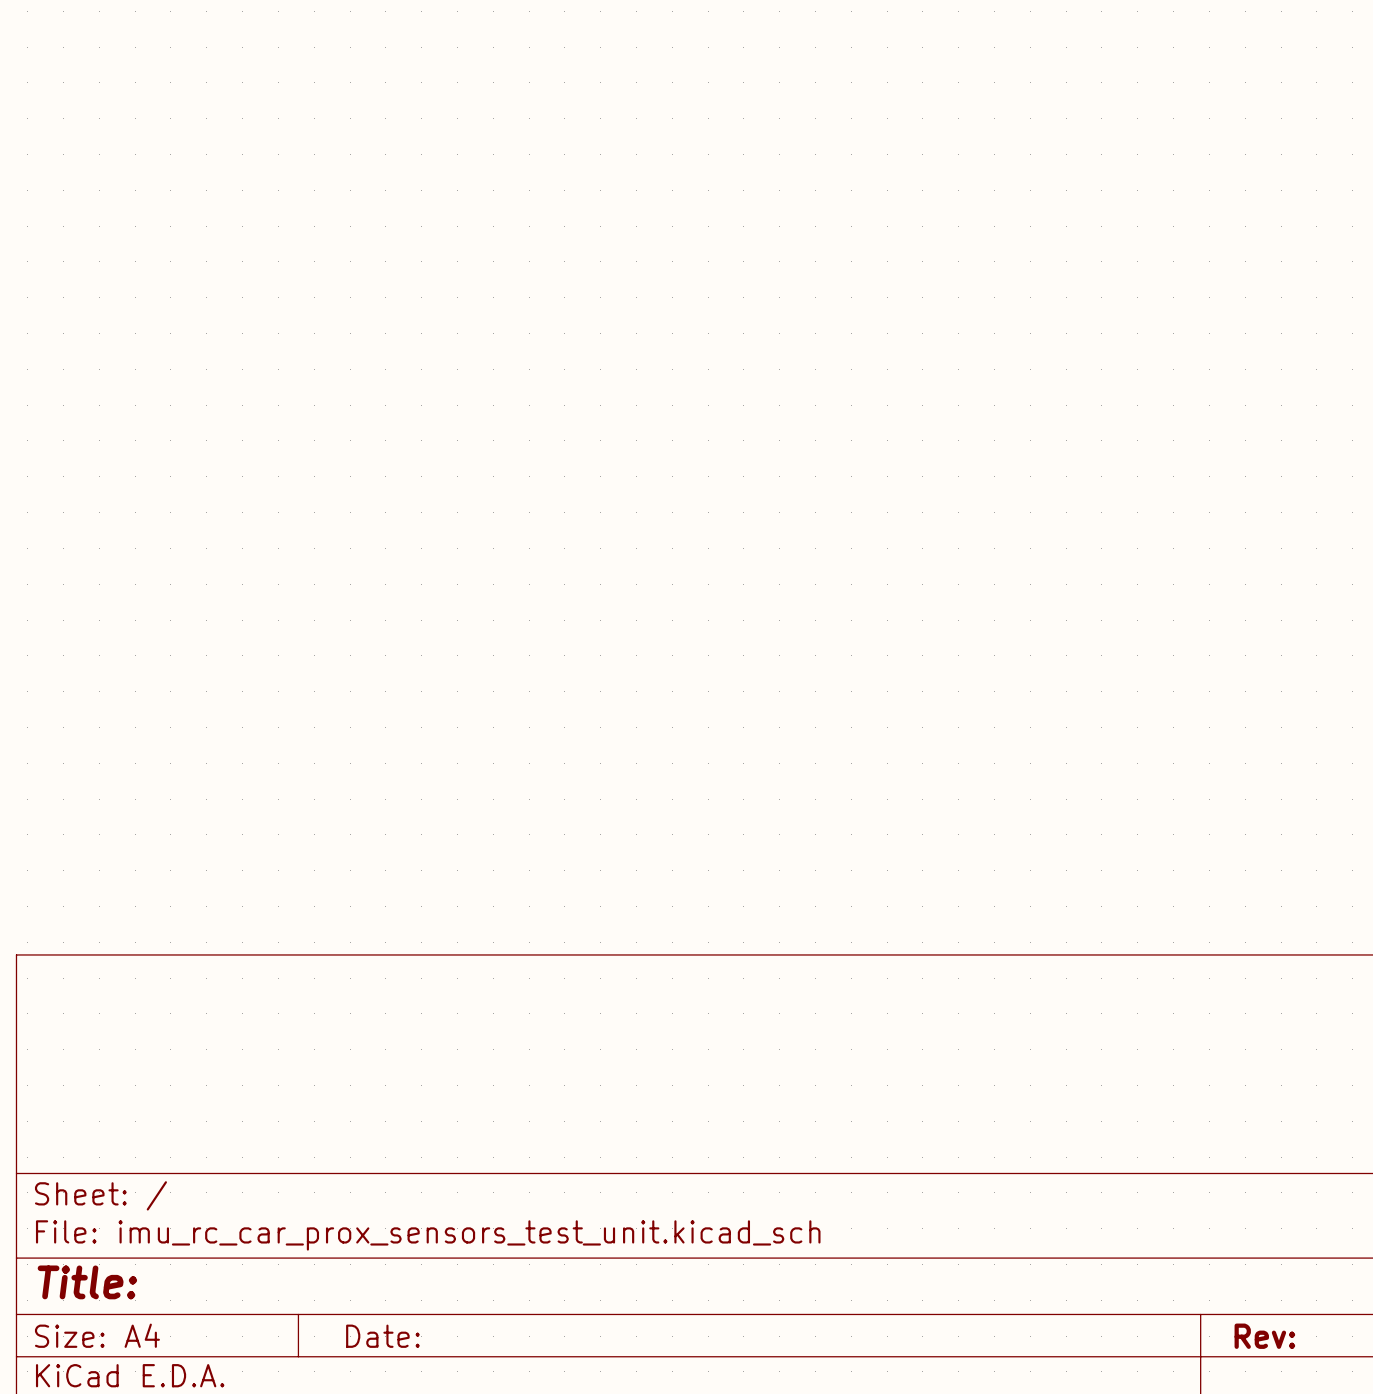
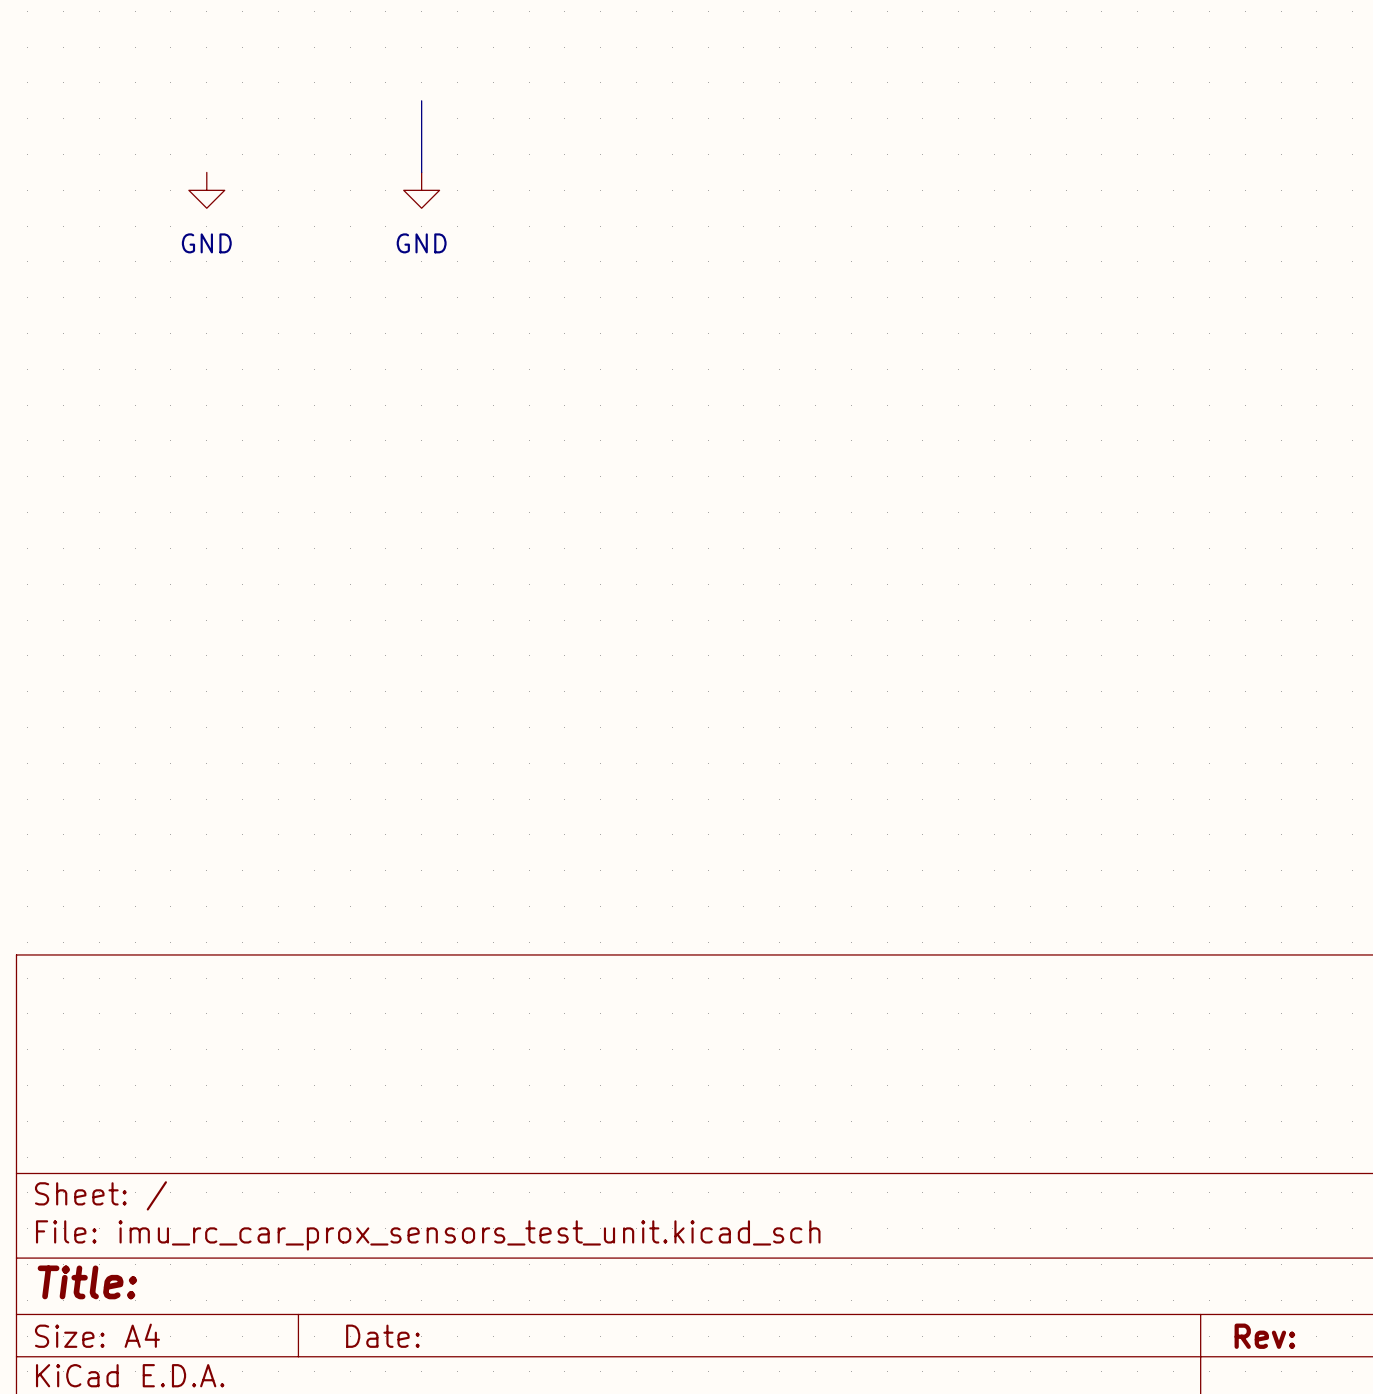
wire: none -> (421, 100) (421, 172)
power symbol: none -> GND (206, 190)
power symbol: none -> GND (421, 190)

